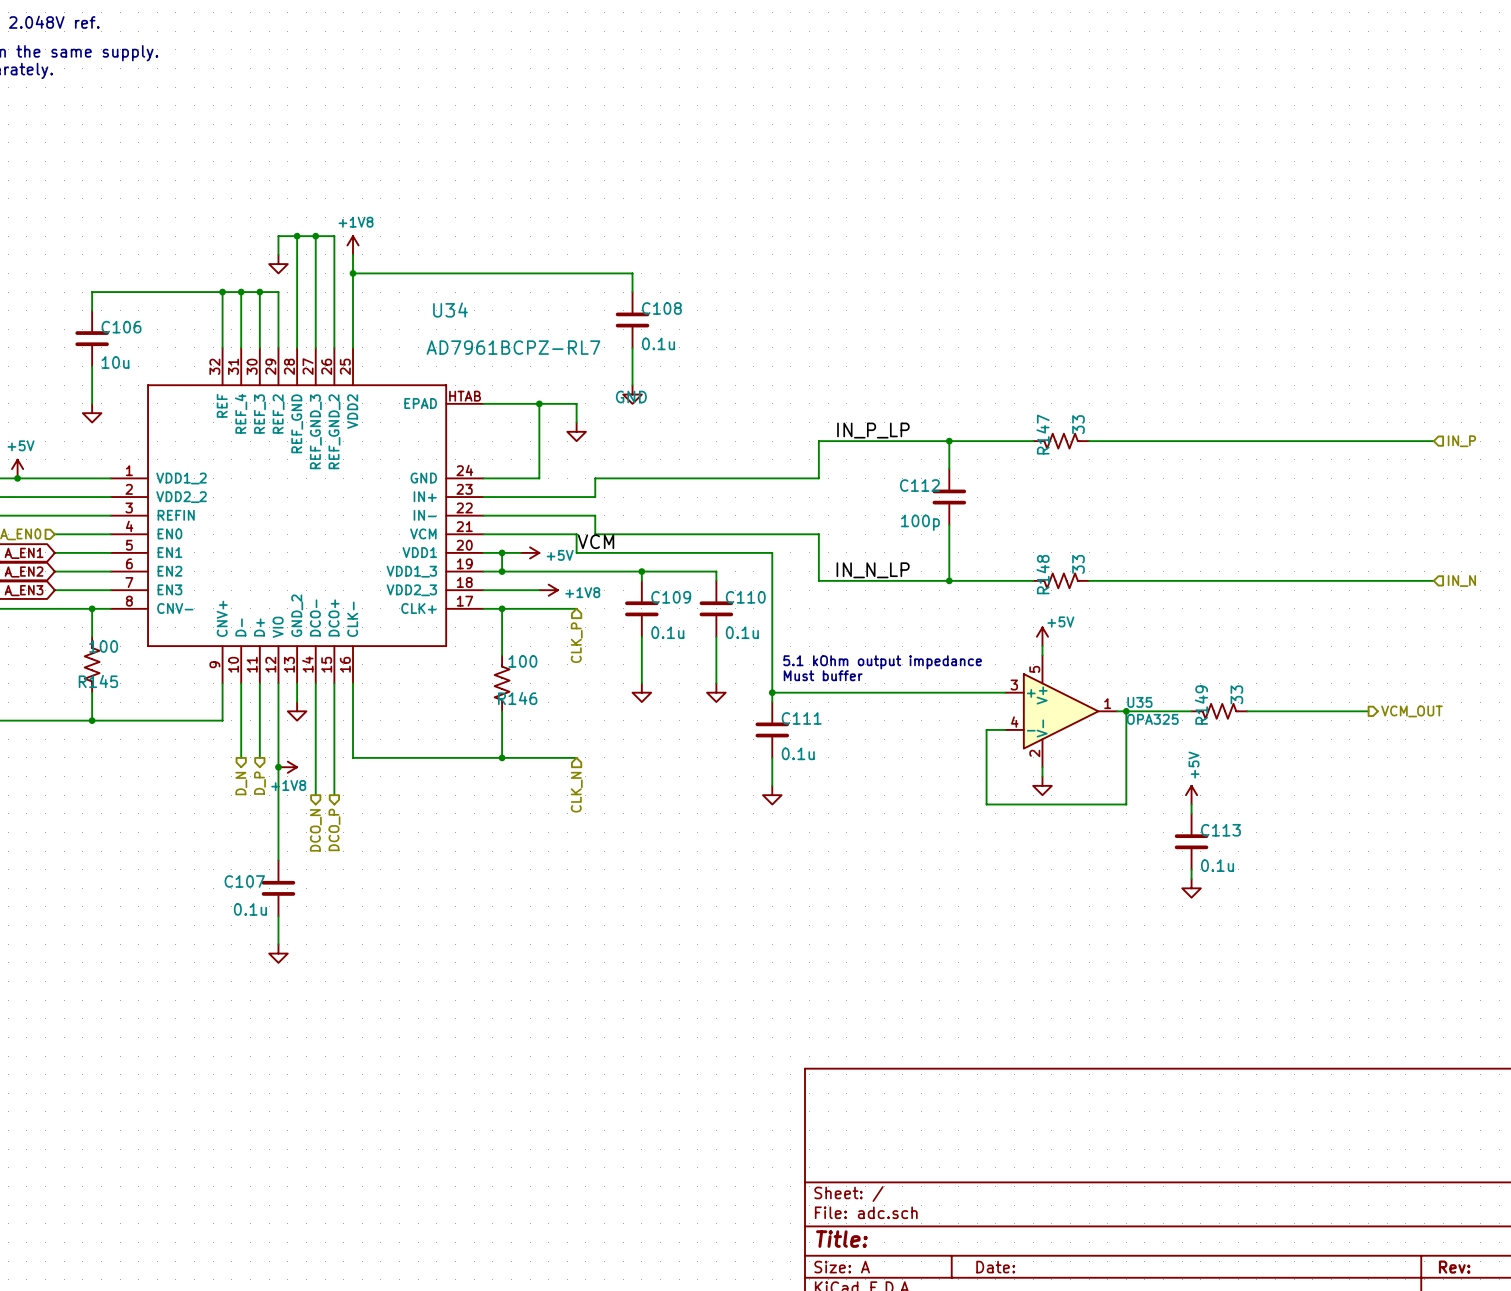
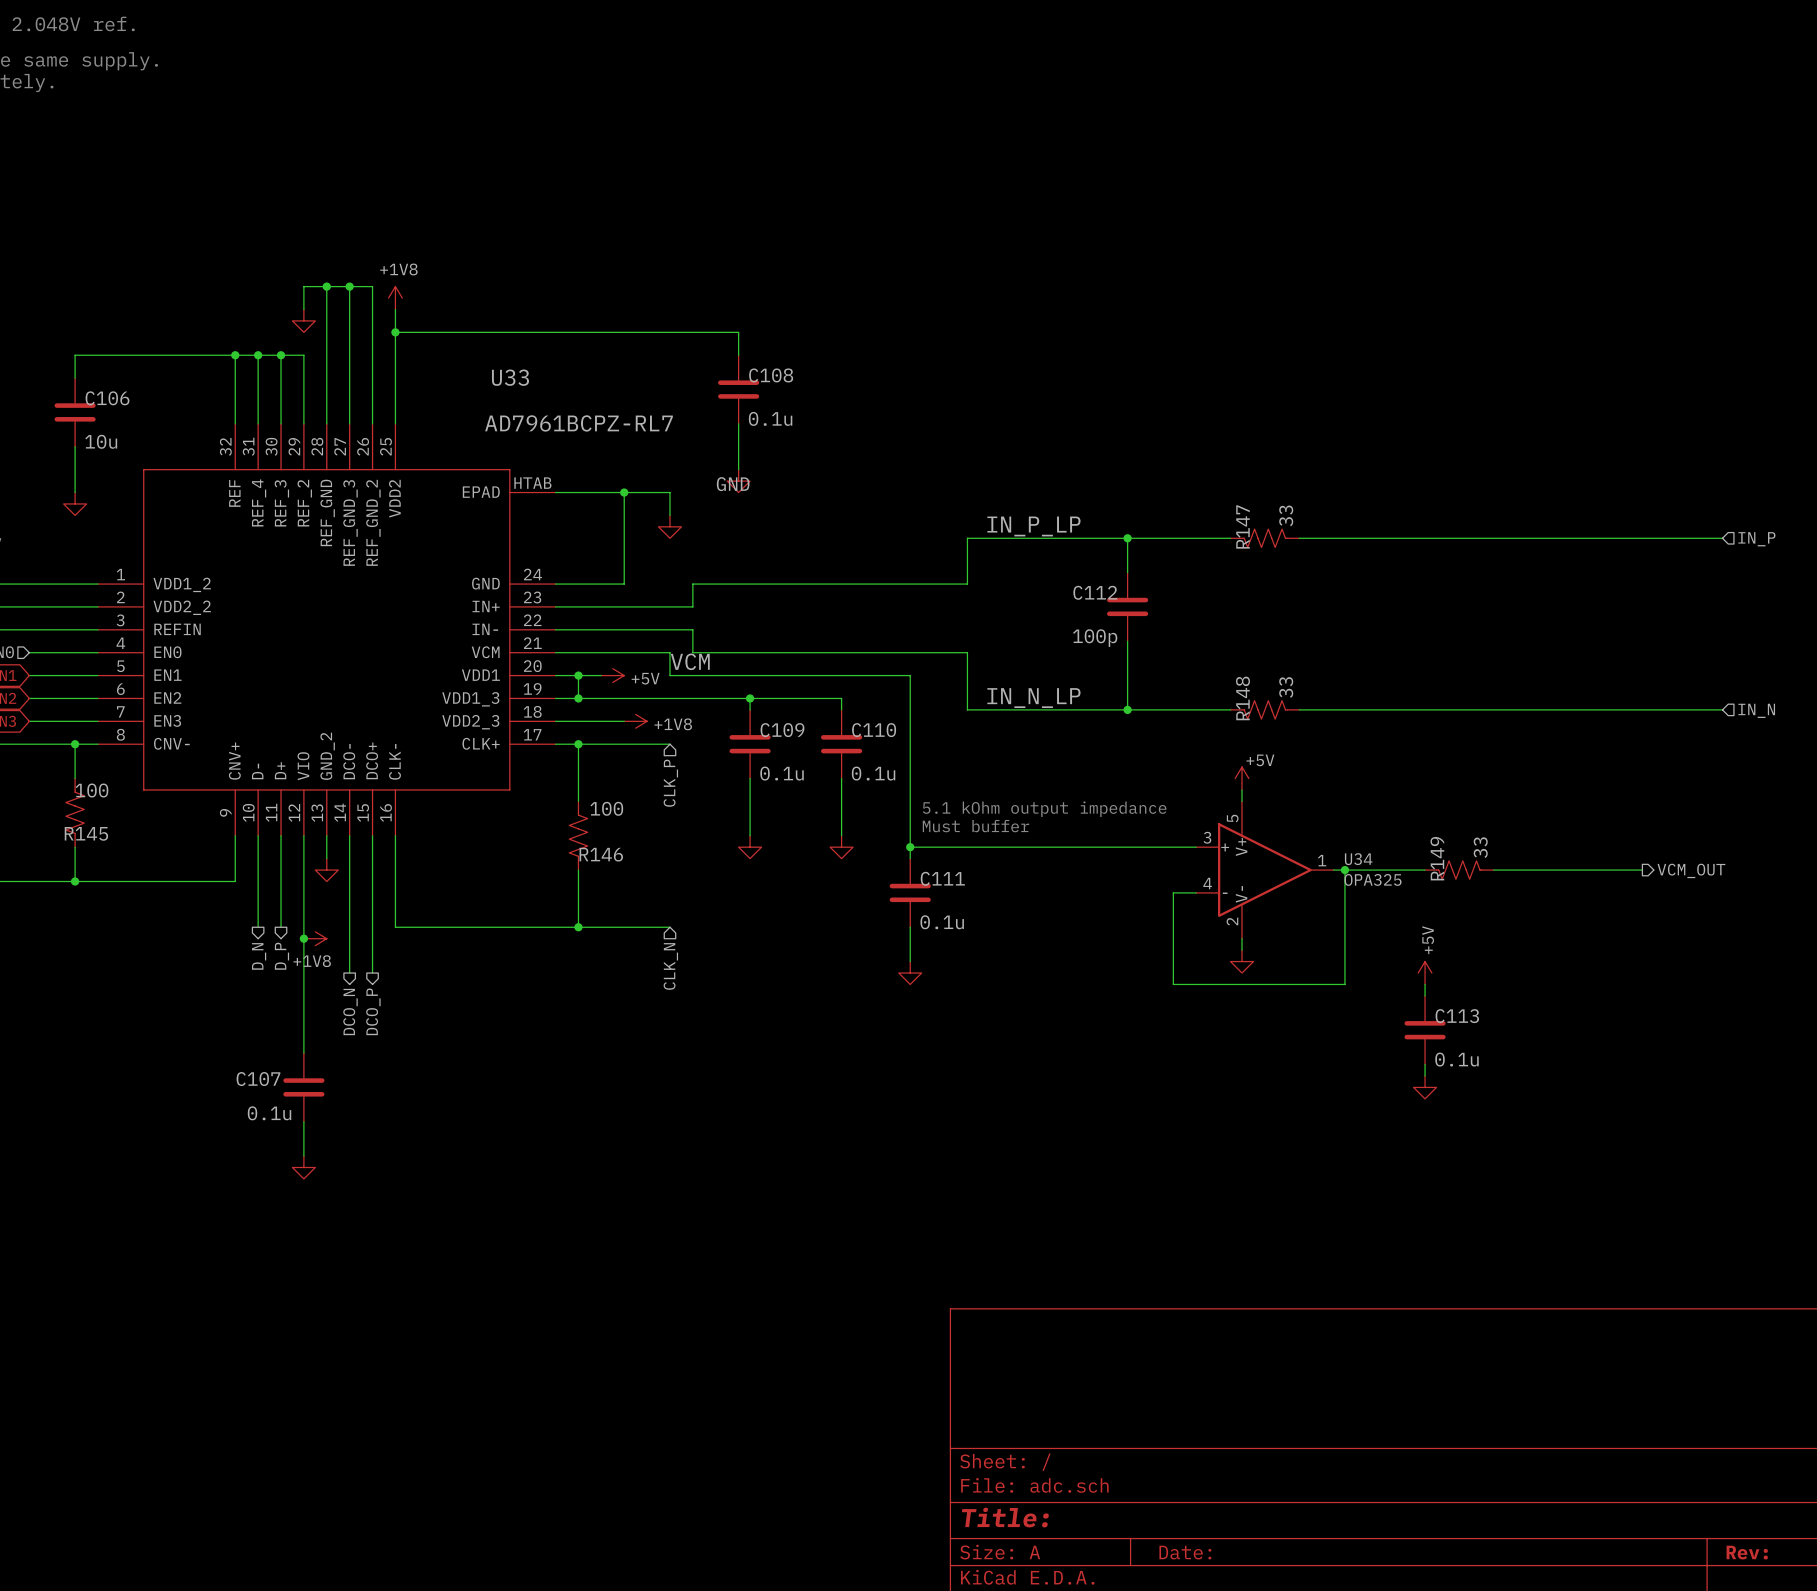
U34 name: U34 (450, 310) -> U33 (510, 377)
U35 name: U35 (1139, 702) -> U34 (1358, 859)

